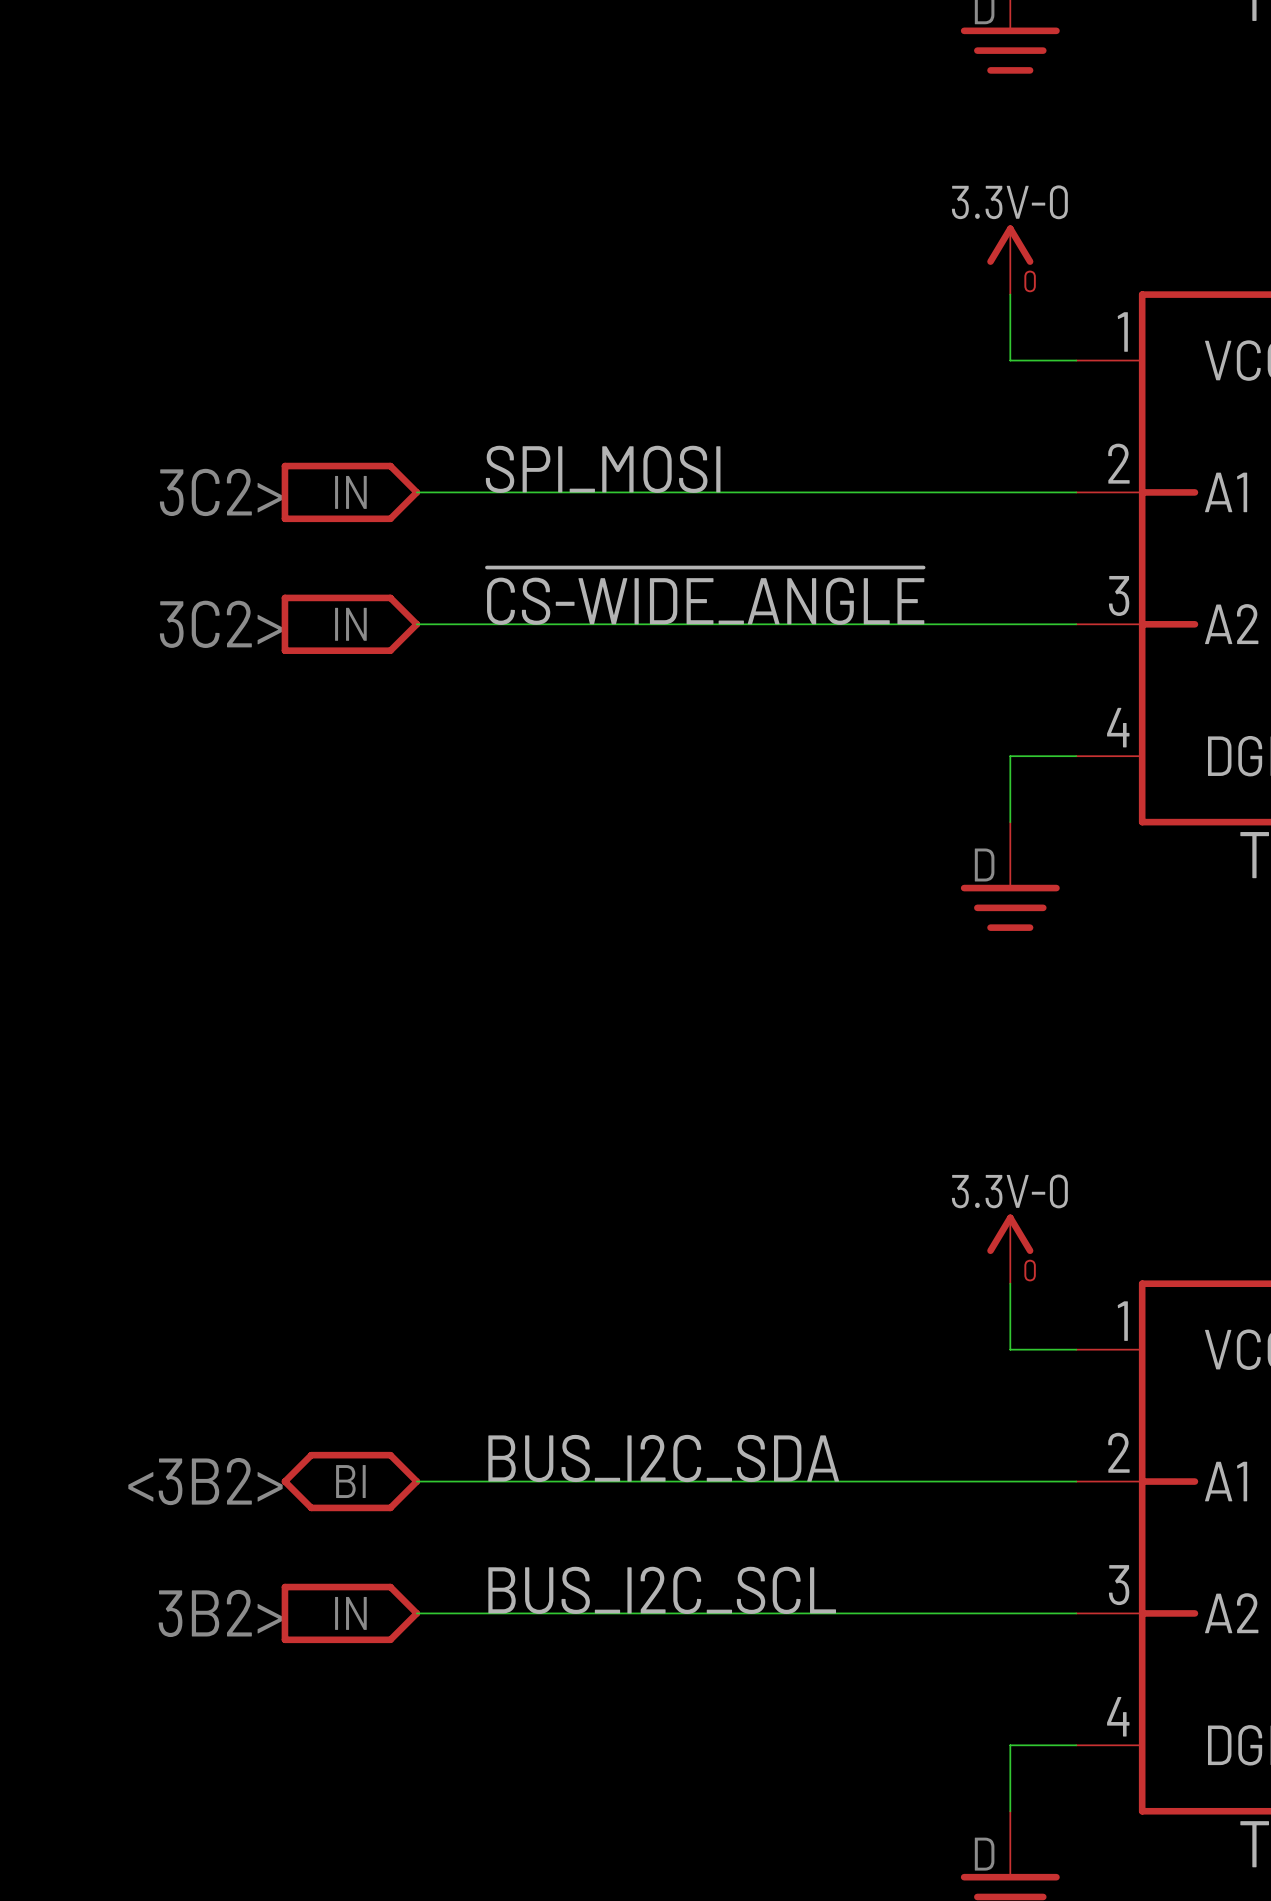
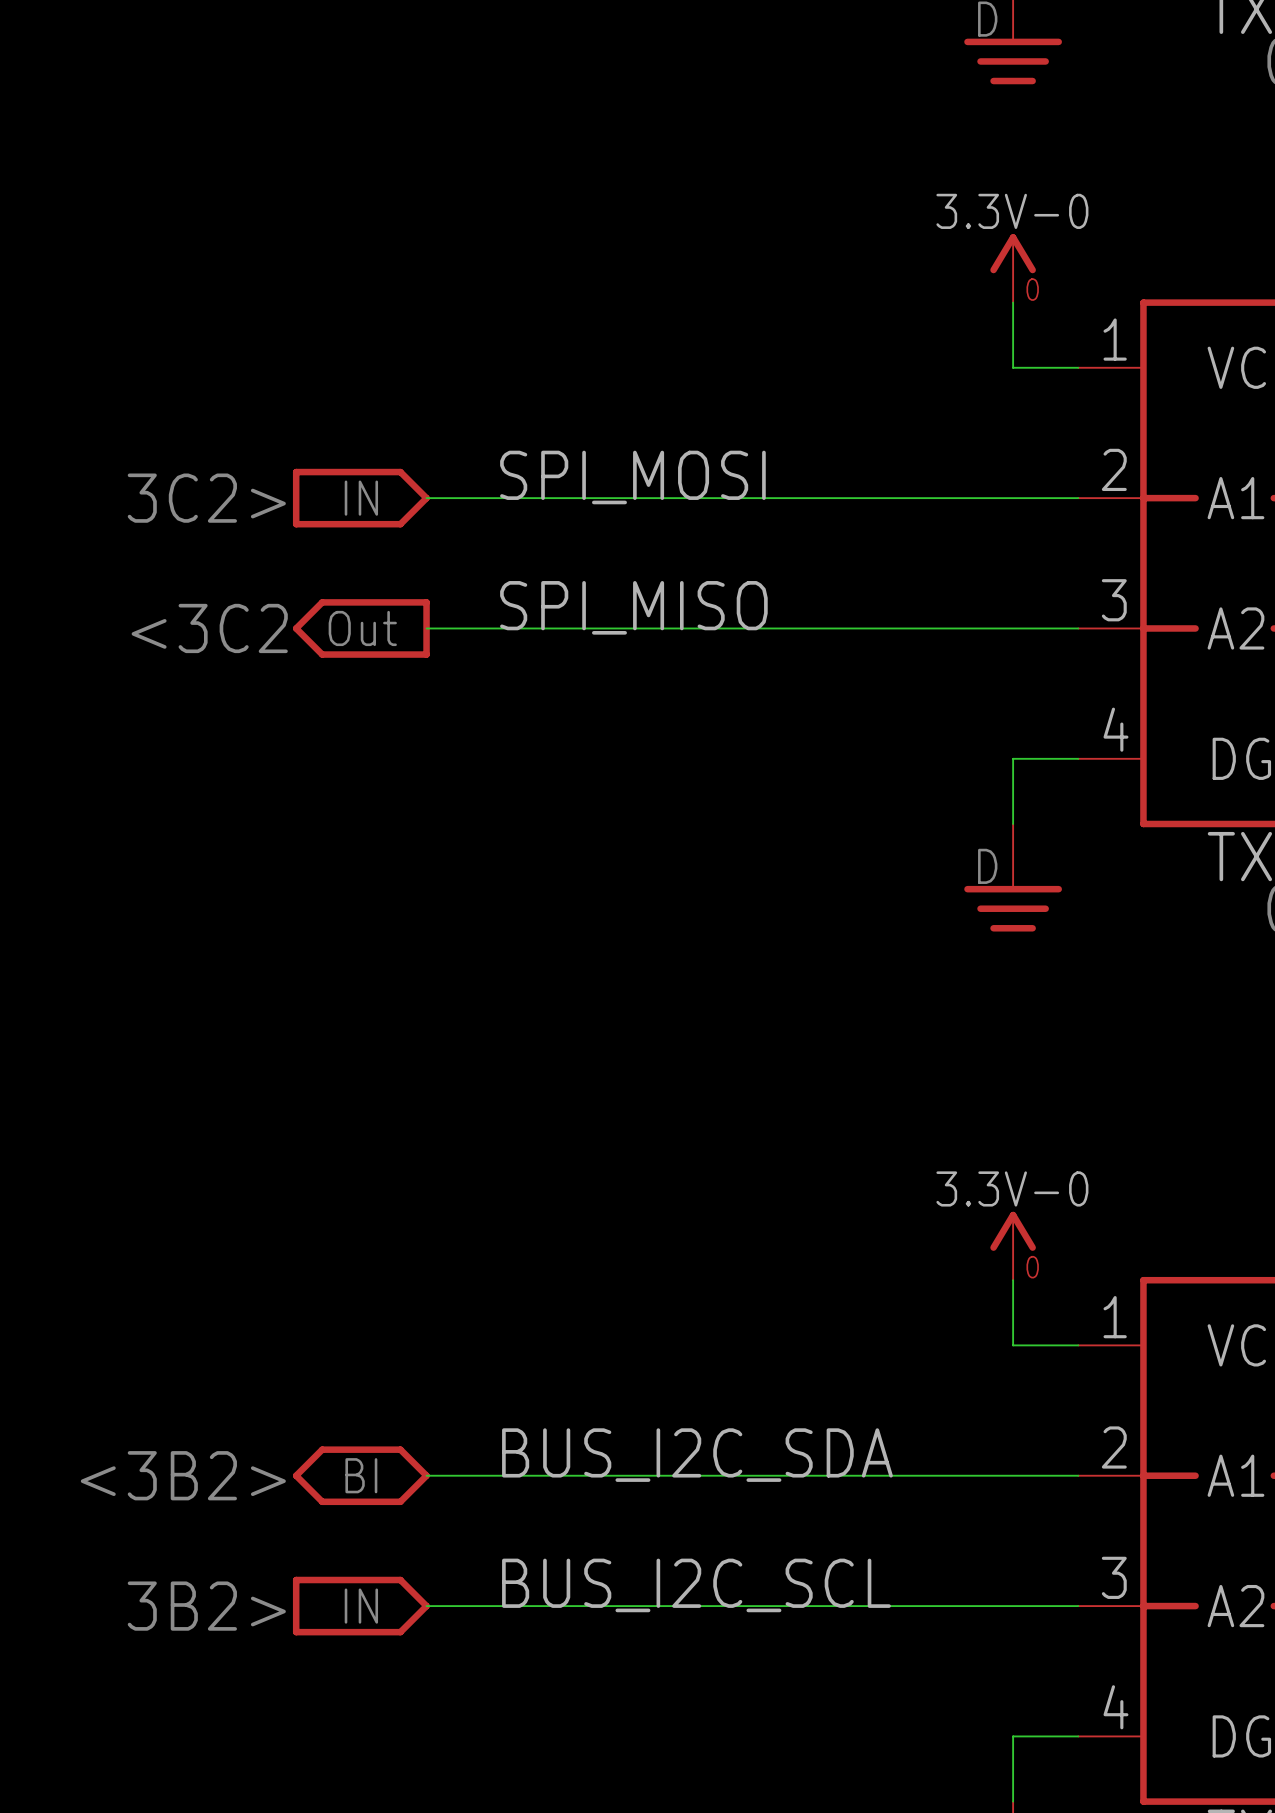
part symbol: [281, 594, 421, 654] -> [292, 599, 430, 658]
label: ~{CS-WIDE_ANGLE} (705, 596) -> SPI_MISO (633, 607)
text: 3C2> (221, 624) -> <3C2 (209, 628)

